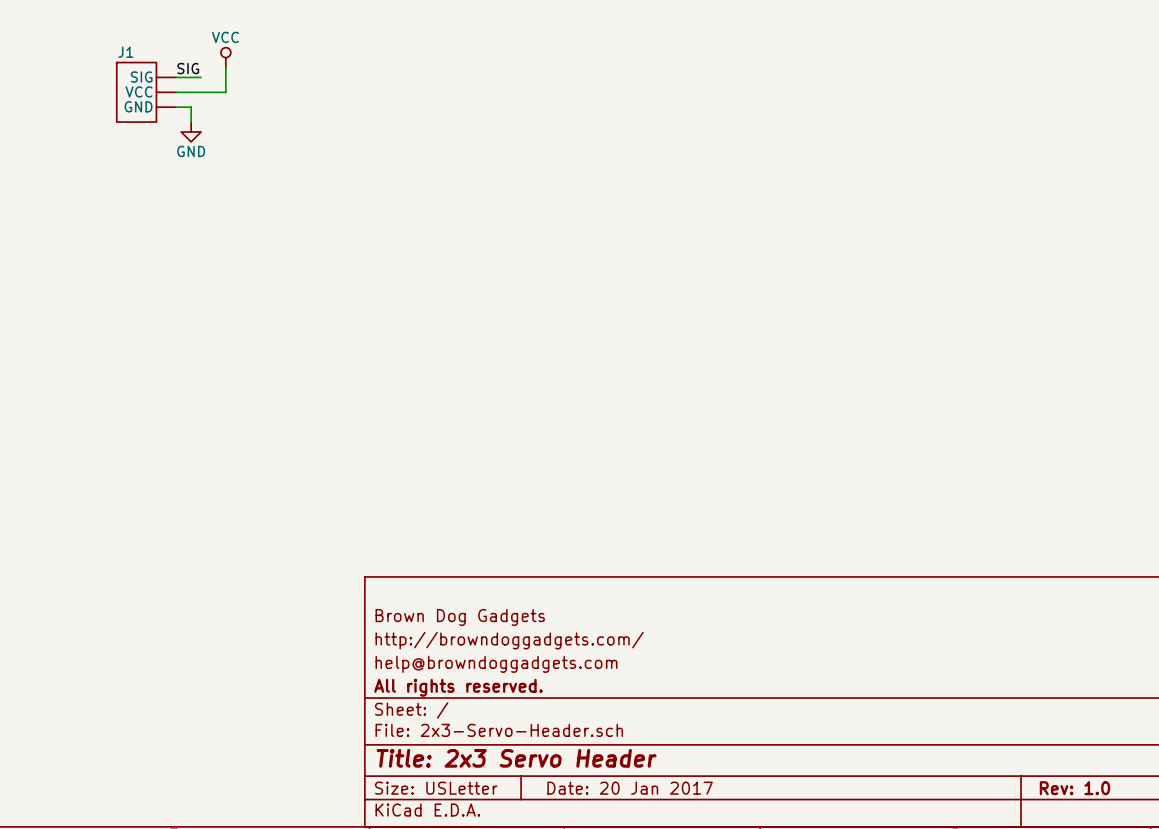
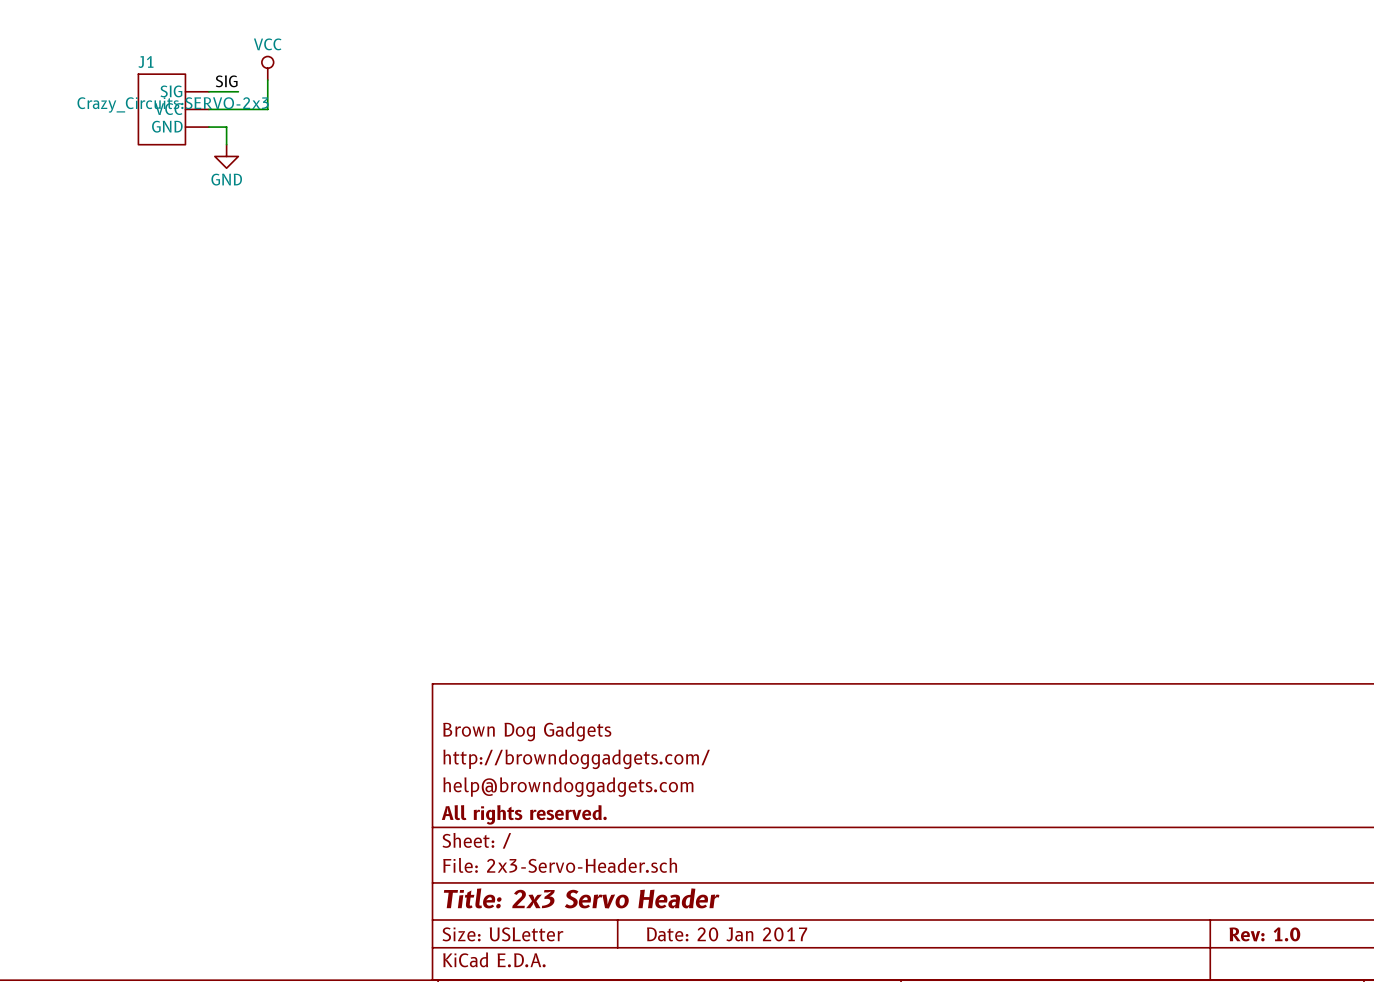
J1 text: none -> Crazy_Circuits:SERVO-2x3 (173, 104)

